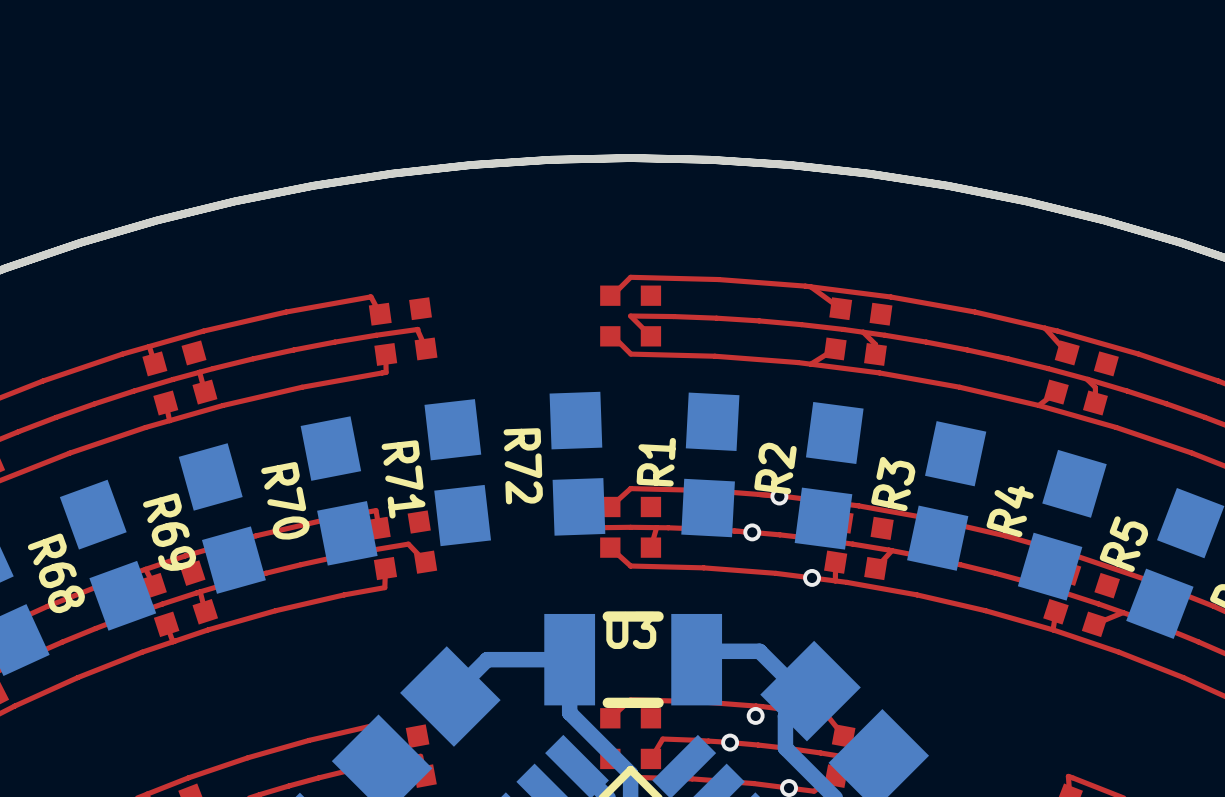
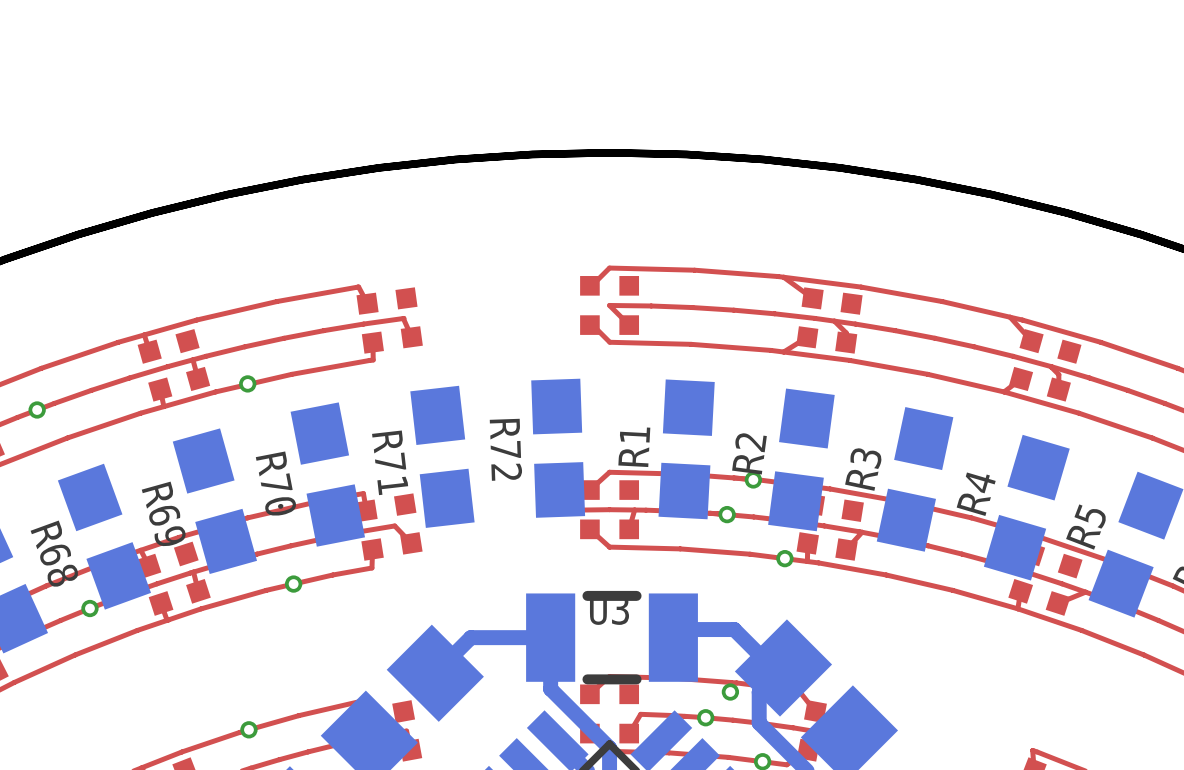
via: none -> (247, 383)
via: none -> (37, 409)
via: none -> (293, 584)
via: none -> (89, 608)
via: none -> (248, 729)

